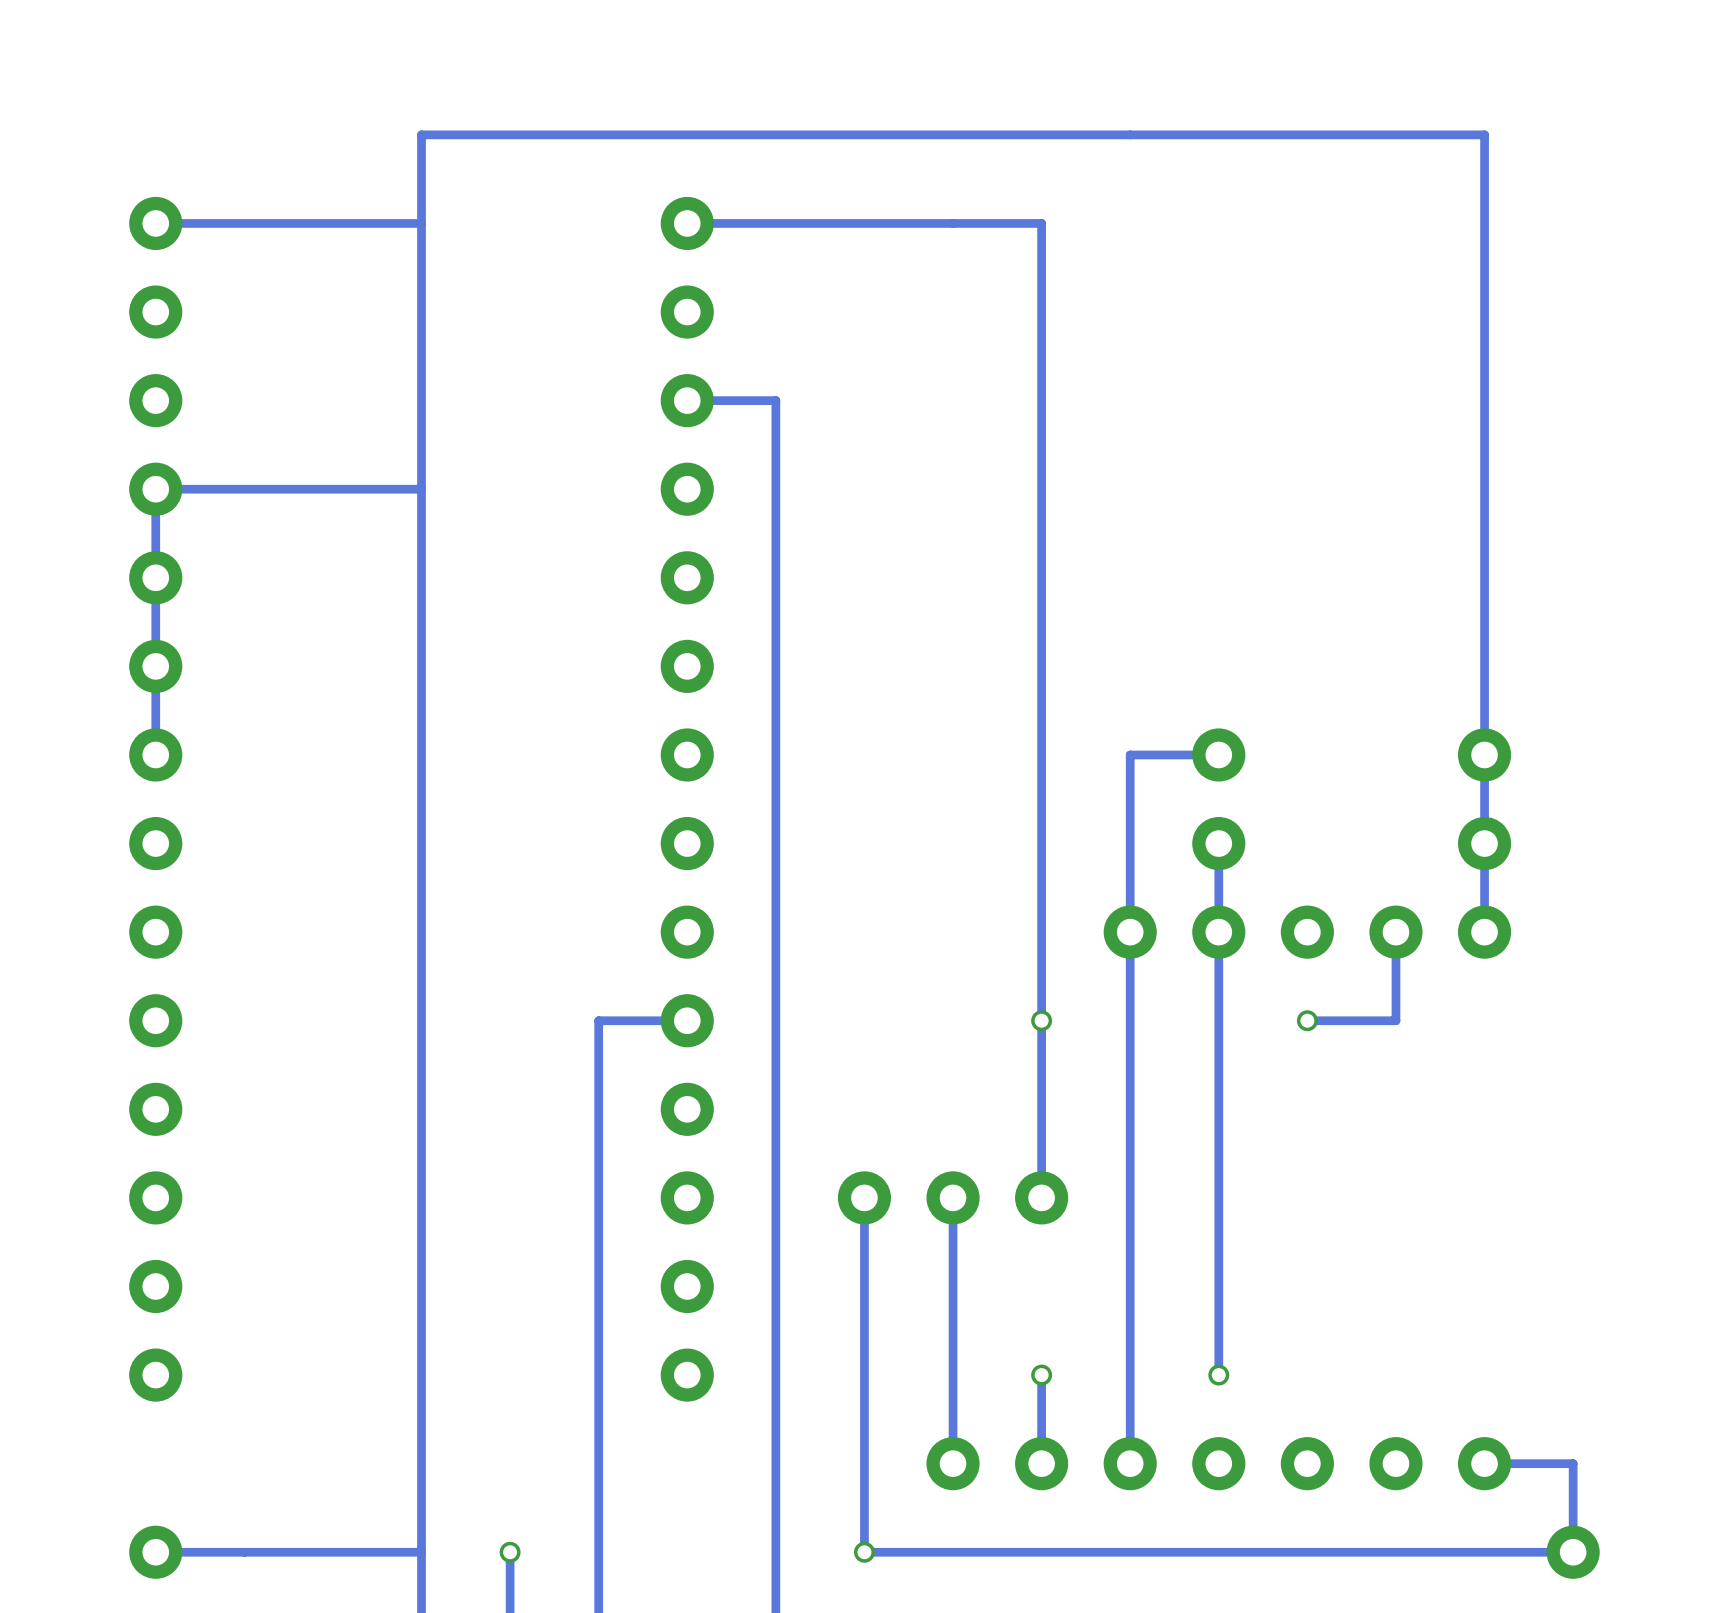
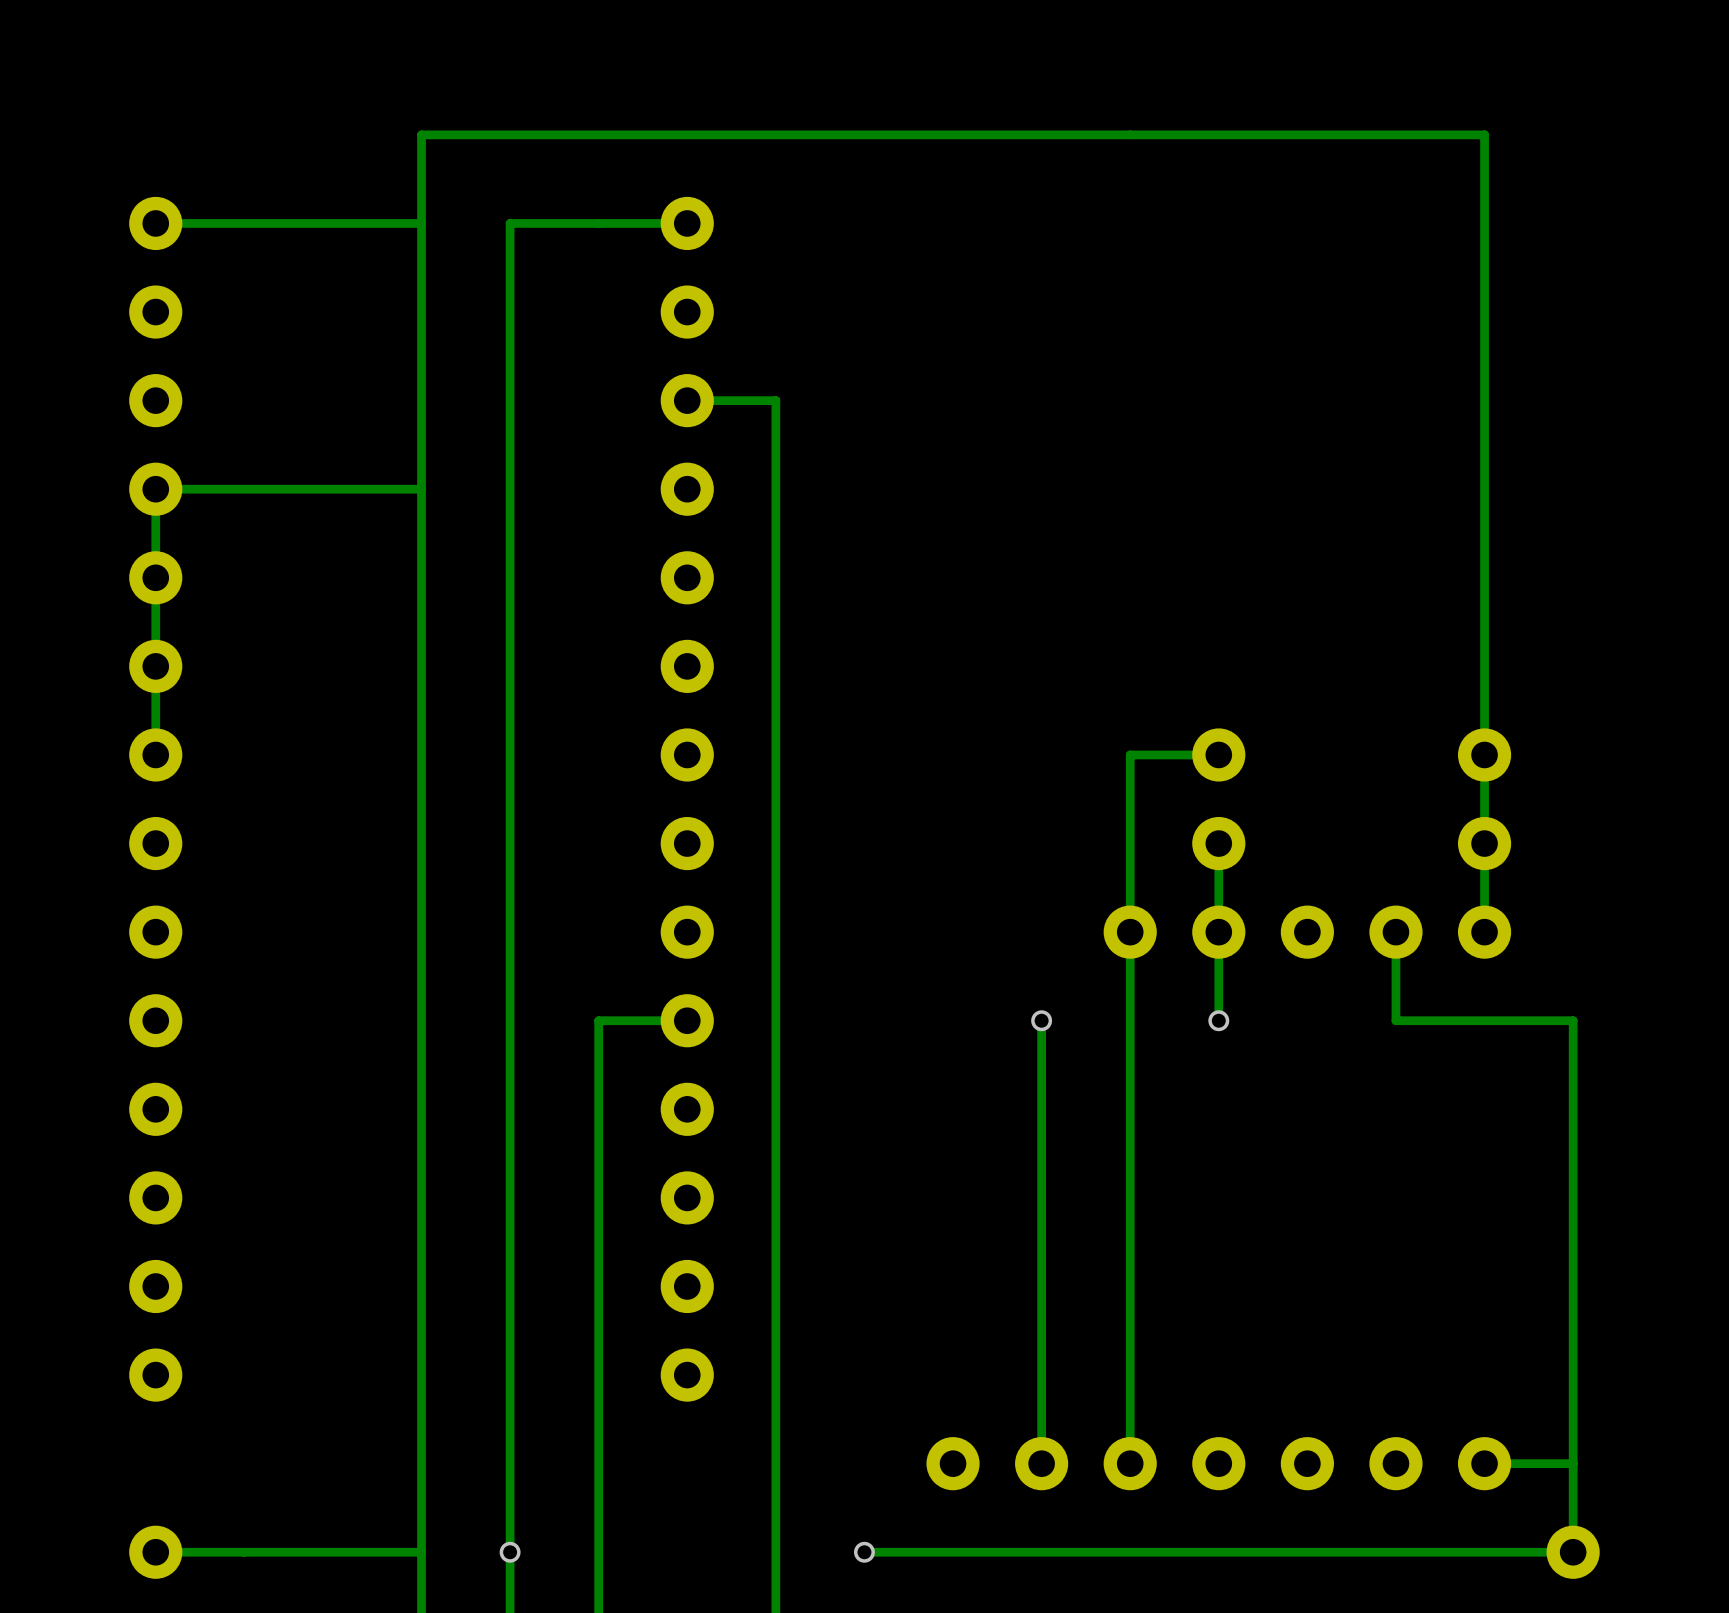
track: (687, 223) (1041, 223) (1041, 1020) -> (687, 223) (510, 223) (510, 1552)
track: (1218, 1020) (1218, 1375) -> none
via position: (1307, 1020) -> (1218, 1020)
track: (1395, 1020) (1307, 1020) -> (1395, 1020) (1573, 1020) (1573, 1463)
track: (864, 1197) (864, 1552) -> none
track: (953, 1197) (953, 1463) -> none
part: (953, 1197) -> none
track: none -> (1041, 1197) (1041, 1375)
via: (1041, 1375) -> none
via: (1218, 1375) -> none

